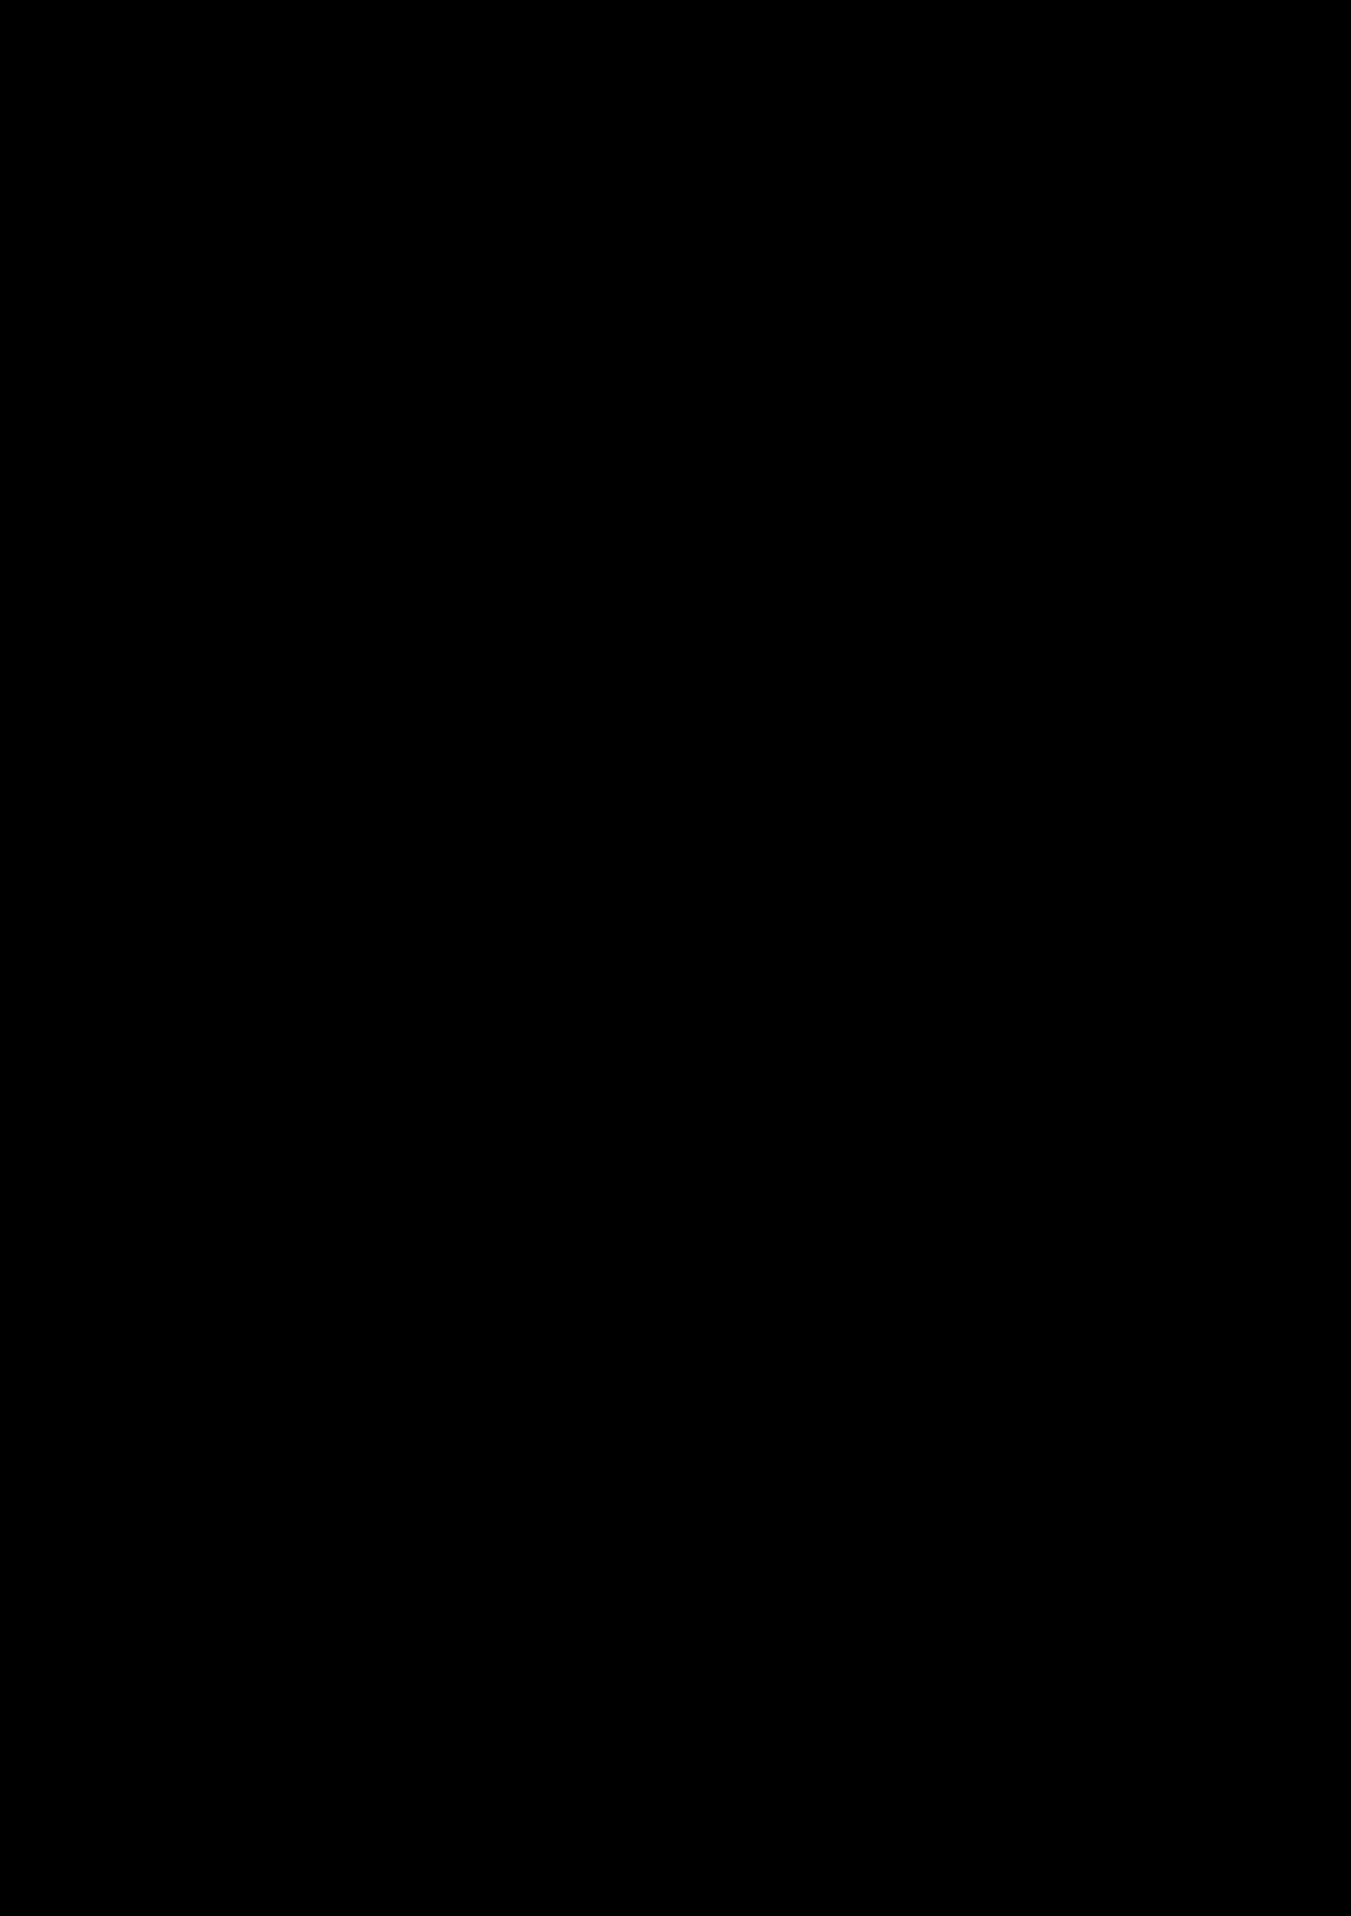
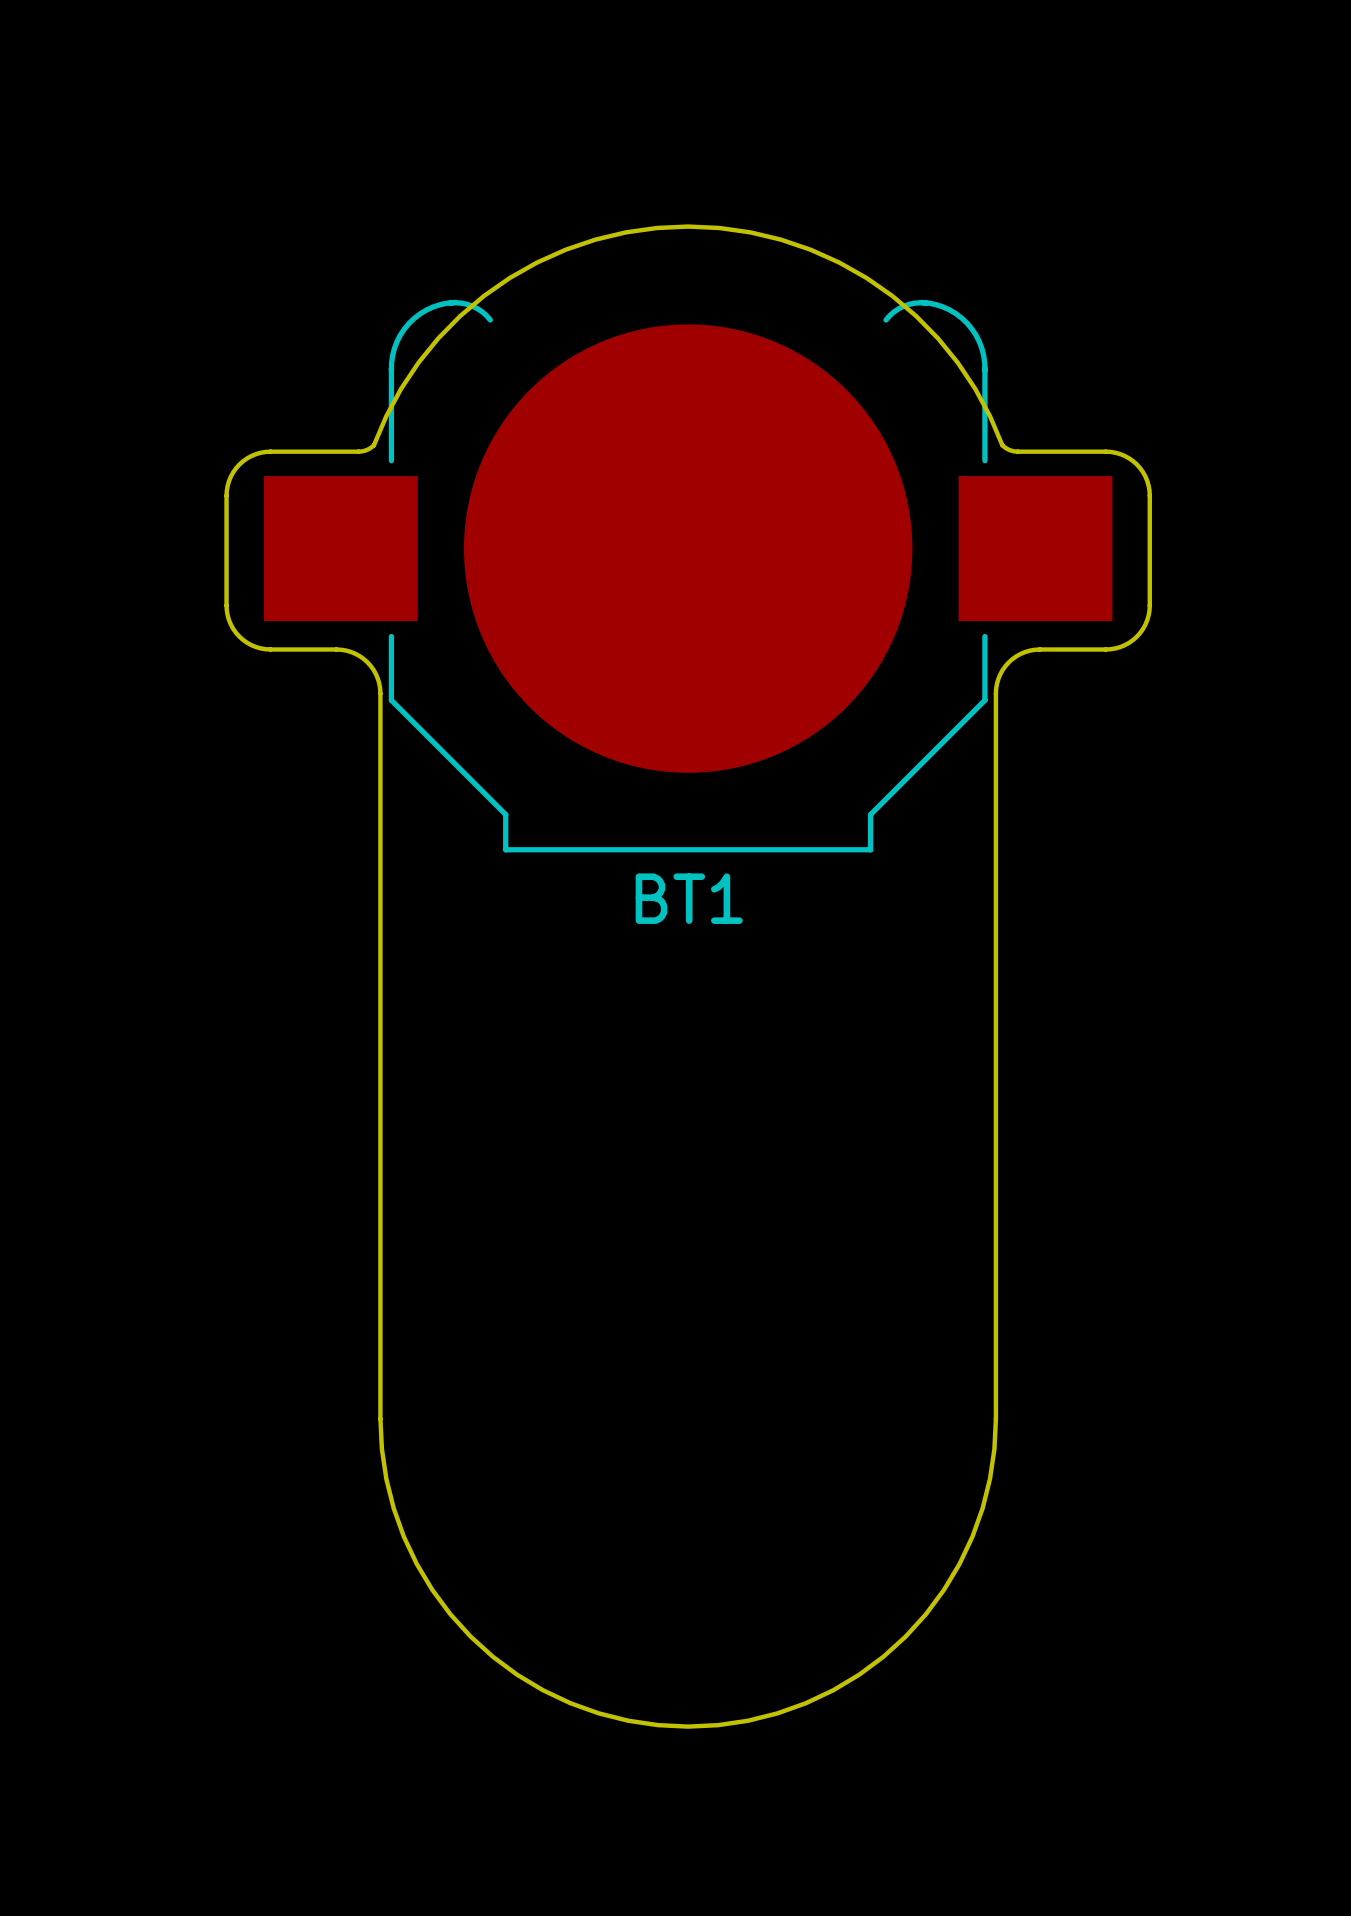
board edge: none -> (373, 445) (386, 416) (418, 362) (438, 338) (484, 295) (537, 262) (595, 239) (625, 232) (688, 226) (750, 232) (810, 249) (839, 262) (892, 295) (938, 338) (975, 388) (1002, 445) (1005, 447) (1017, 451) (1115, 452) (1129, 458) (1136, 464) (1147, 481) (1149, 495) (1149, 605) (1147, 620) (1140, 632) (1129, 642) (1110, 649) (1039, 649) (1025, 651) (1012, 659) (1005, 666) (998, 678) (996, 688) (995, 1418) (994, 1449) (982, 1508) (959, 1563) (944, 1589) (905, 1636) (859, 1674) (833, 1690) (777, 1713) (718, 1725) (658, 1725) (598, 1713) (543, 1690) (492, 1656) (450, 1614) (416, 1563) (393, 1508) (386, 1478) (380, 1418) (379, 683) (370, 666) (359, 656) (350, 651) (336, 649) (265, 649) (251, 645) (239, 636) (233, 628) (229, 620) (226, 605) (226, 490) (230, 476) (239, 464) (251, 456) (265, 451) (358, 451) (366, 449) (373, 445)
BT1: none -> (688, 576)

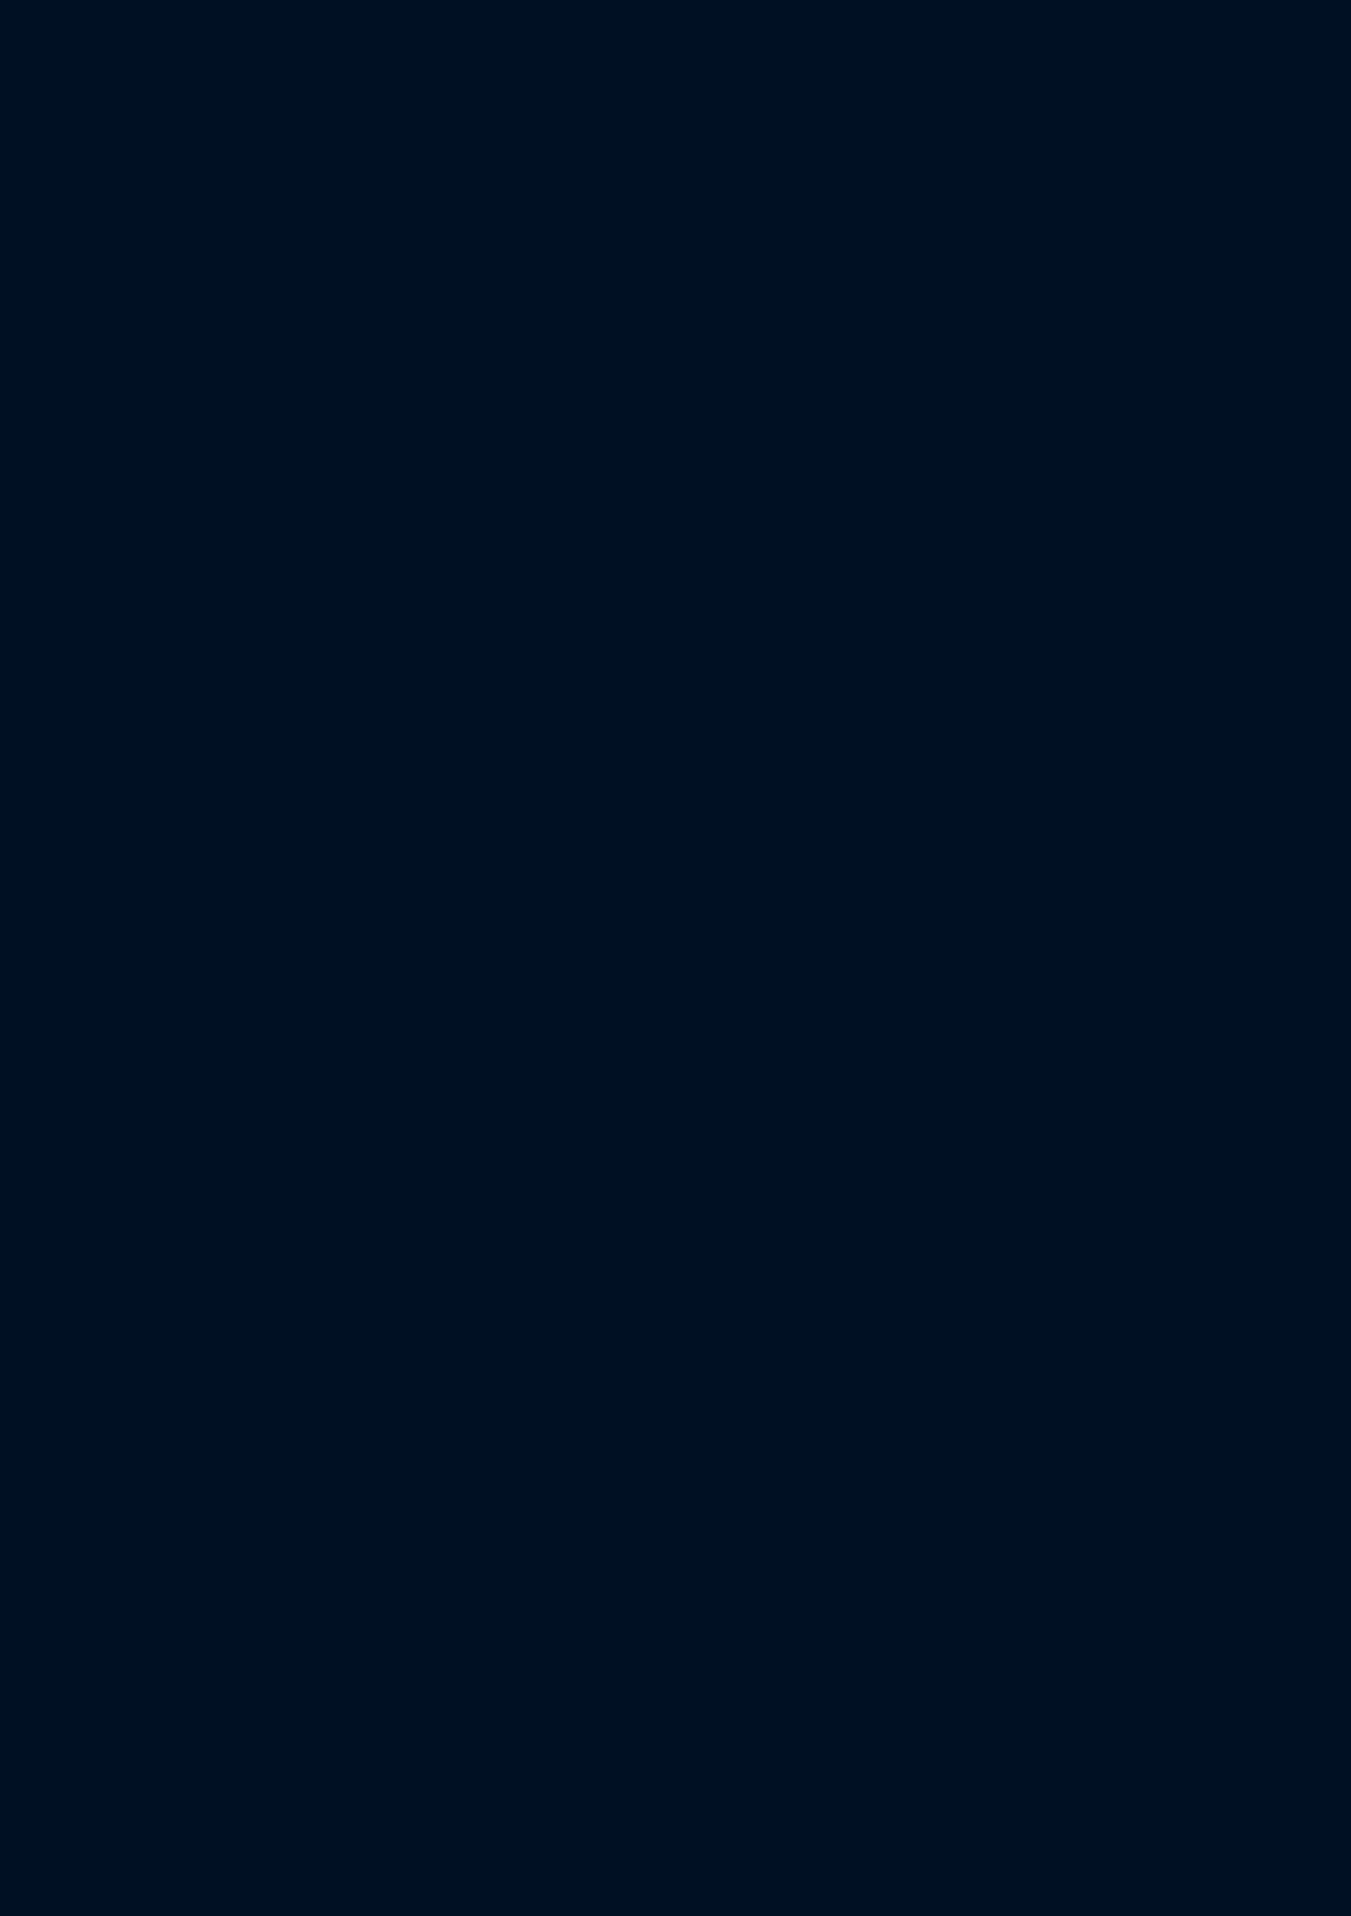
board edge: (373, 445) (386, 416) (418, 362) (438, 338) (484, 295) (537, 262) (595, 239) (625, 232) (688, 226) (750, 232) (810, 249) (839, 262) (892, 295) (938, 338) (975, 388) (1002, 445) (1005, 447) (1017, 451) (1115, 452) (1129, 458) (1136, 464) (1147, 481) (1149, 495) (1149, 605) (1147, 620) (1140, 632) (1129, 642) (1110, 649) (1039, 649) (1025, 651) (1012, 659) (1005, 666) (998, 678) (996, 688) (995, 1418) (994, 1449) (982, 1508) (959, 1563) (944, 1589) (905, 1636) (859, 1674) (833, 1690) (777, 1713) (718, 1725) (658, 1725) (598, 1713) (543, 1690) (492, 1656) (450, 1614) (416, 1563) (393, 1508) (386, 1478) (380, 1418) (379, 683) (370, 666) (359, 656) (350, 651) (336, 649) (265, 649) (251, 645) (239, 636) (233, 628) (229, 620) (226, 605) (226, 490) (230, 476) (239, 464) (251, 456) (265, 451) (358, 451) (366, 449) (373, 445) -> none
BT1: (688, 576) -> none

